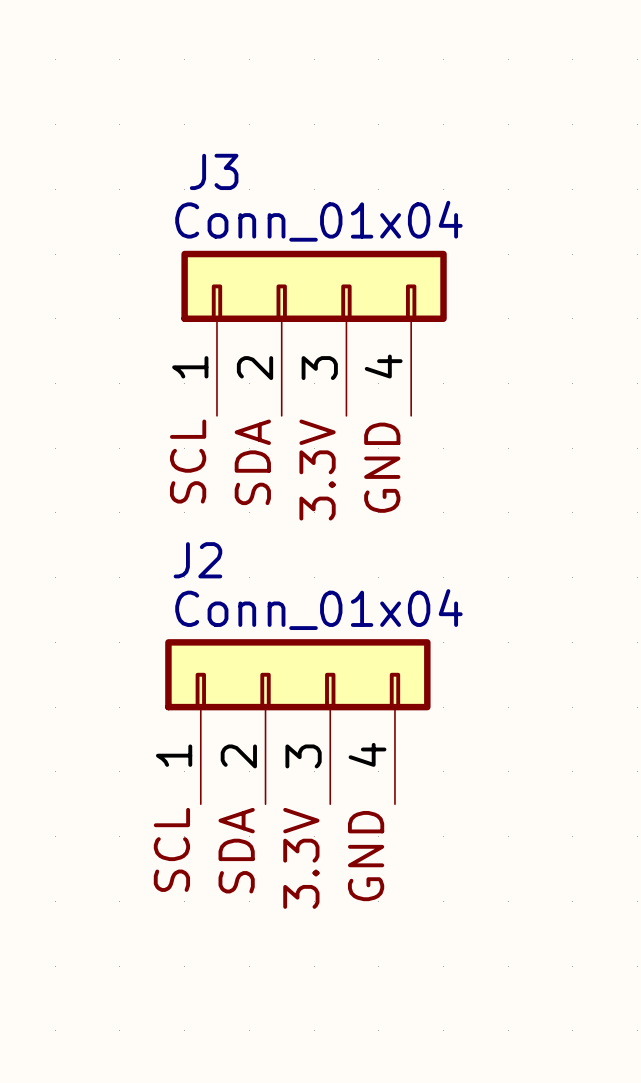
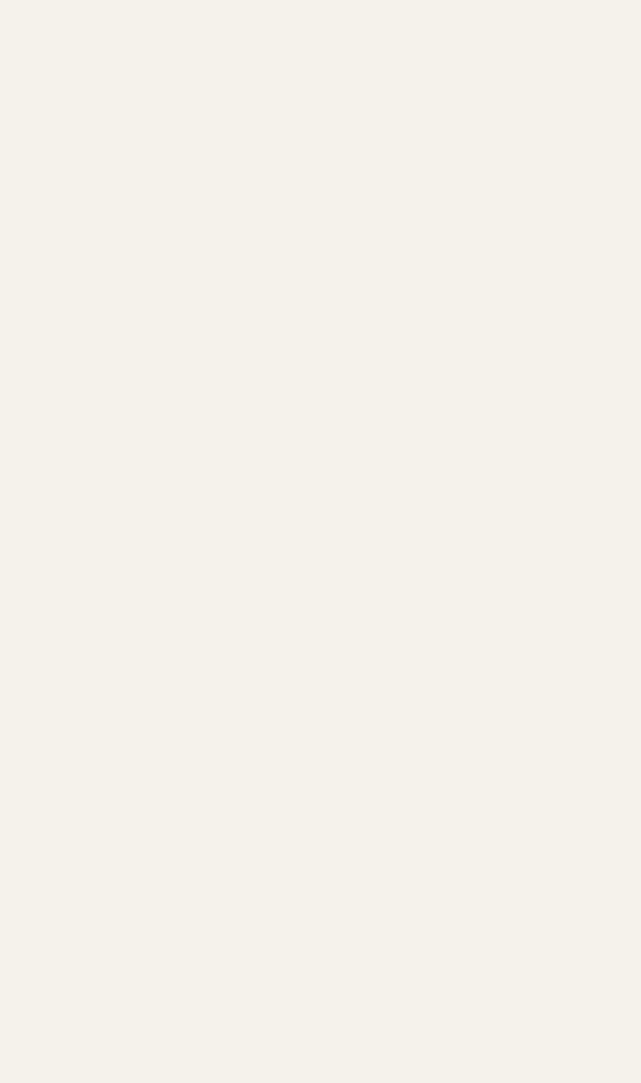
J3: Conn_01x04 (314, 333) -> none
label: SCL (188, 461) -> none
label: SDA (252, 462) -> none
label: GND (382, 467) -> none
label: 3.3V (317, 470) -> none
J2: Conn_01x04 (297, 721) -> none
label: SCL (171, 849) -> none
label: SDA (236, 850) -> none
label: GND (366, 856) -> none
label: 3.3V (301, 858) -> none

